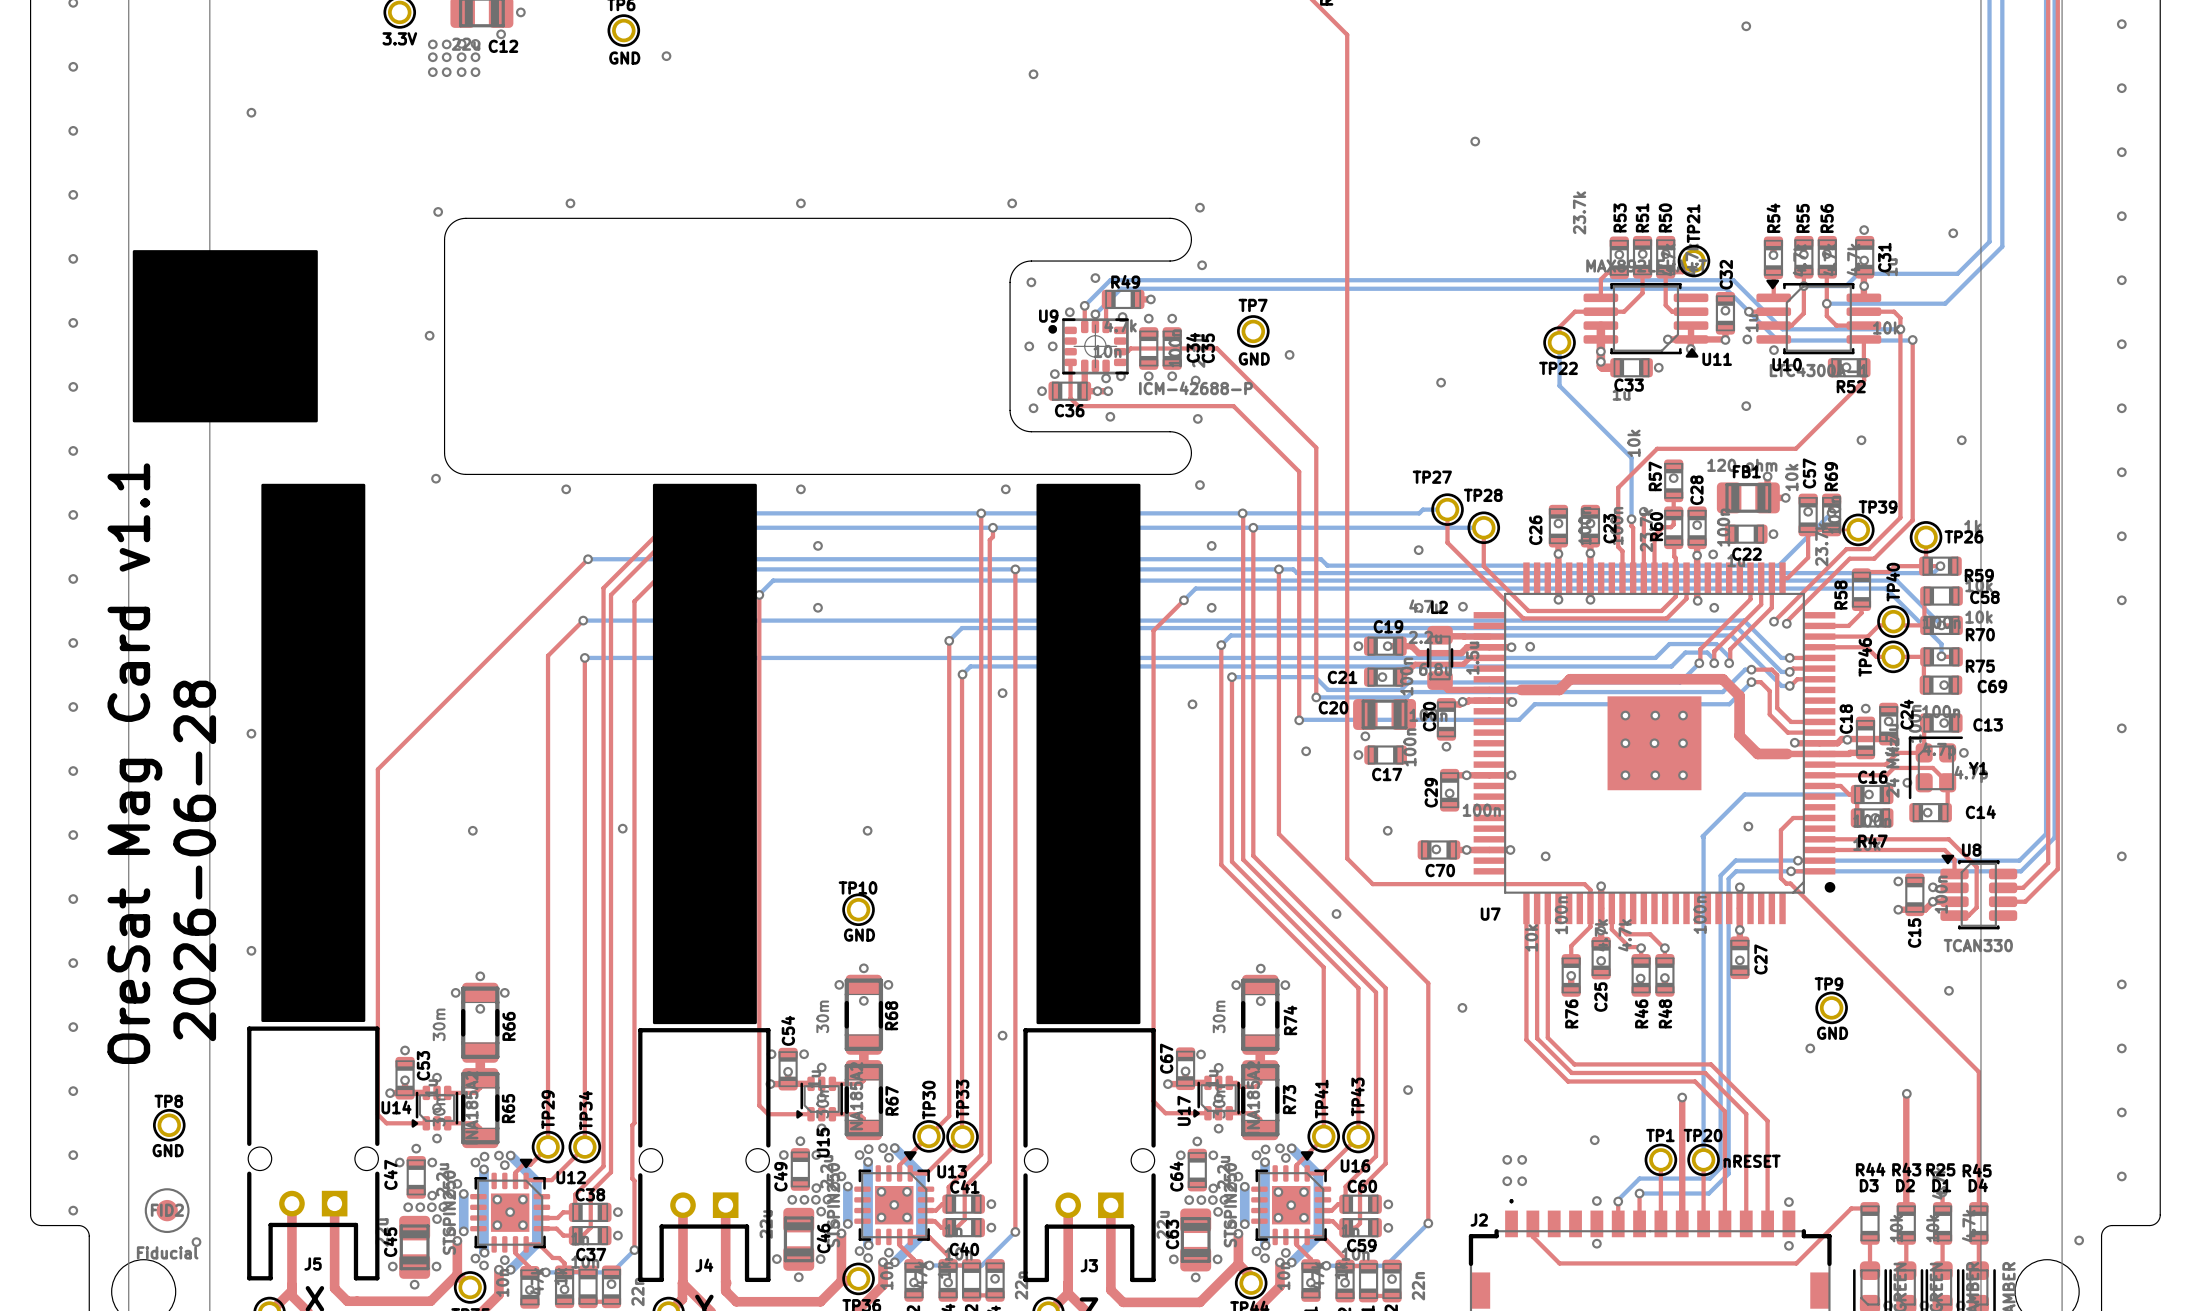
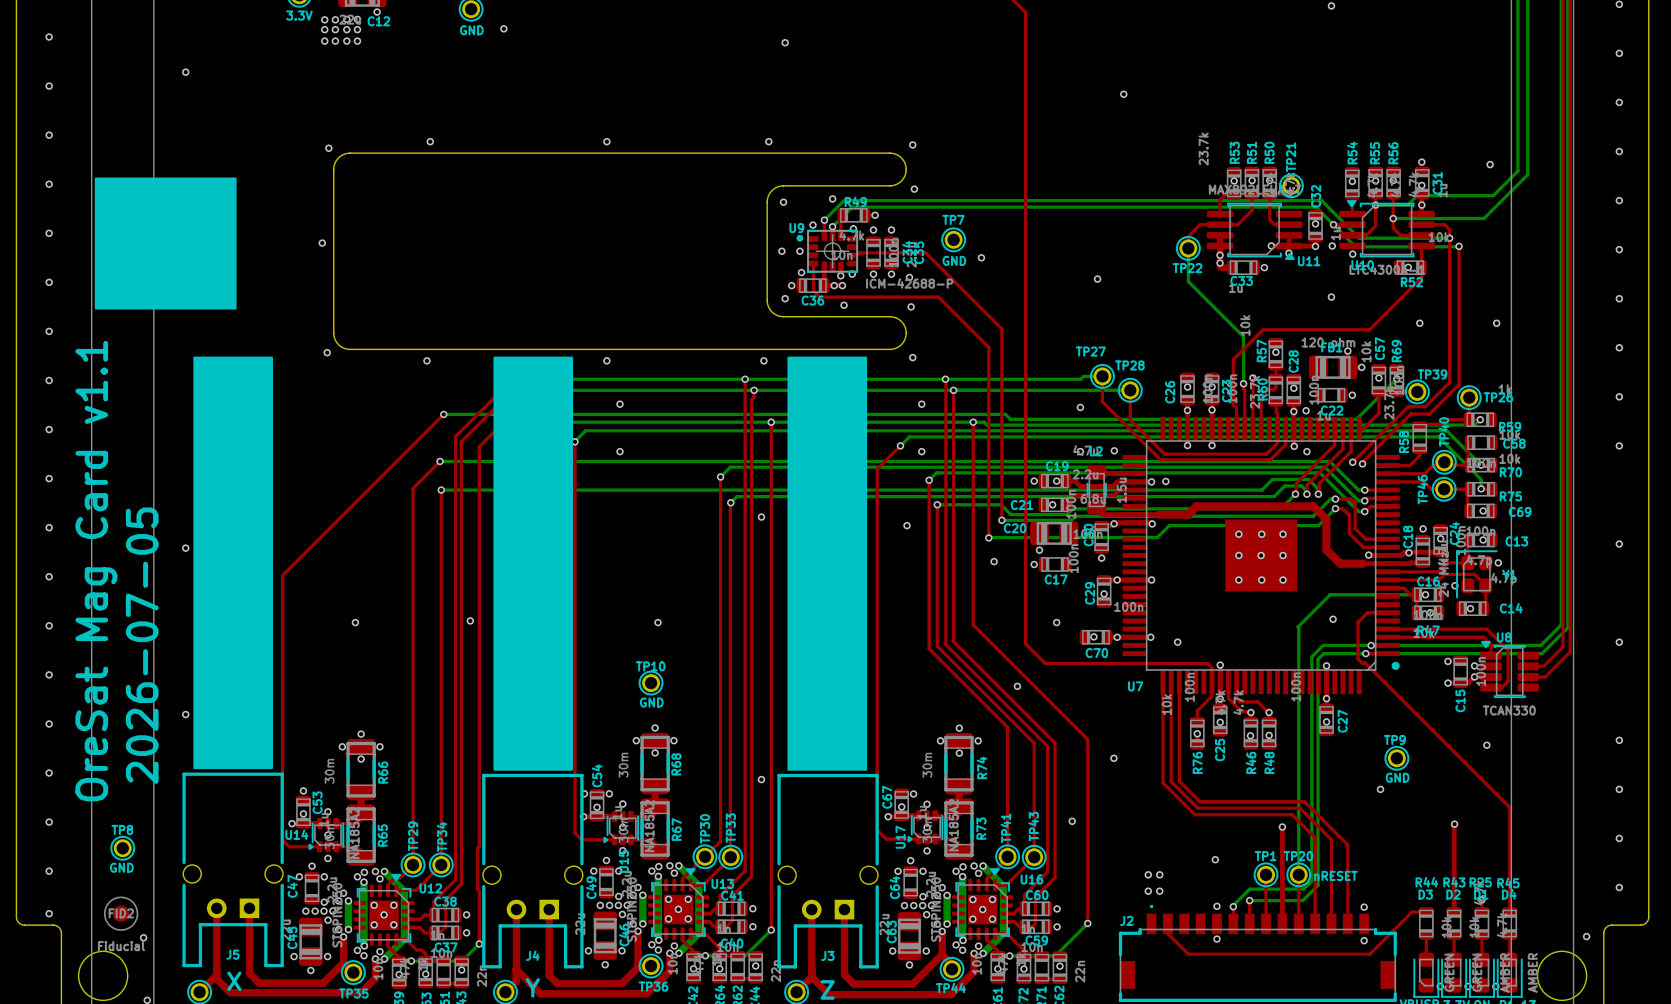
text: 2026-06-28 (194, 860) -> 2026-07-05 (142, 645)

